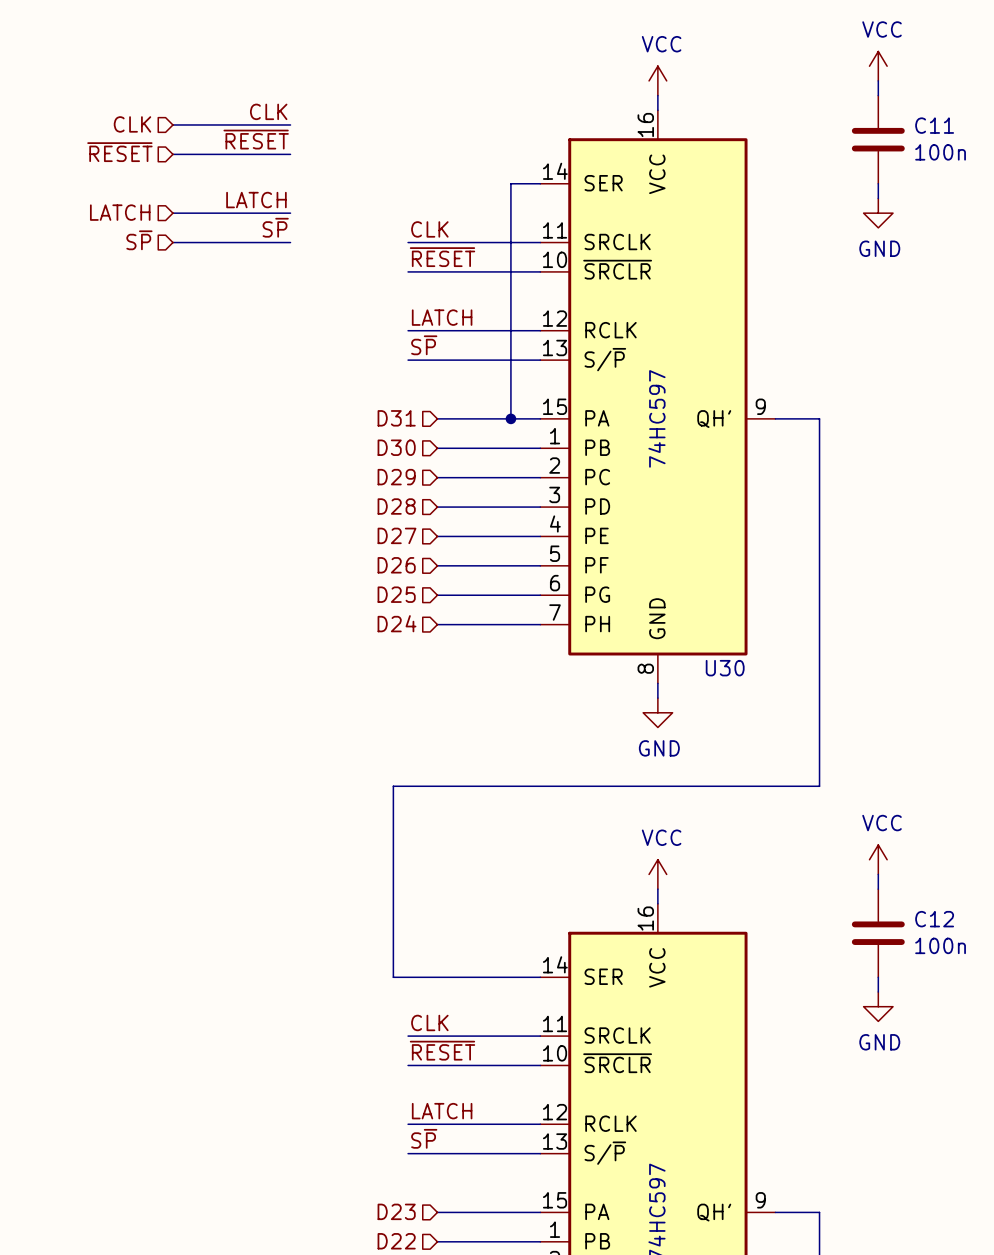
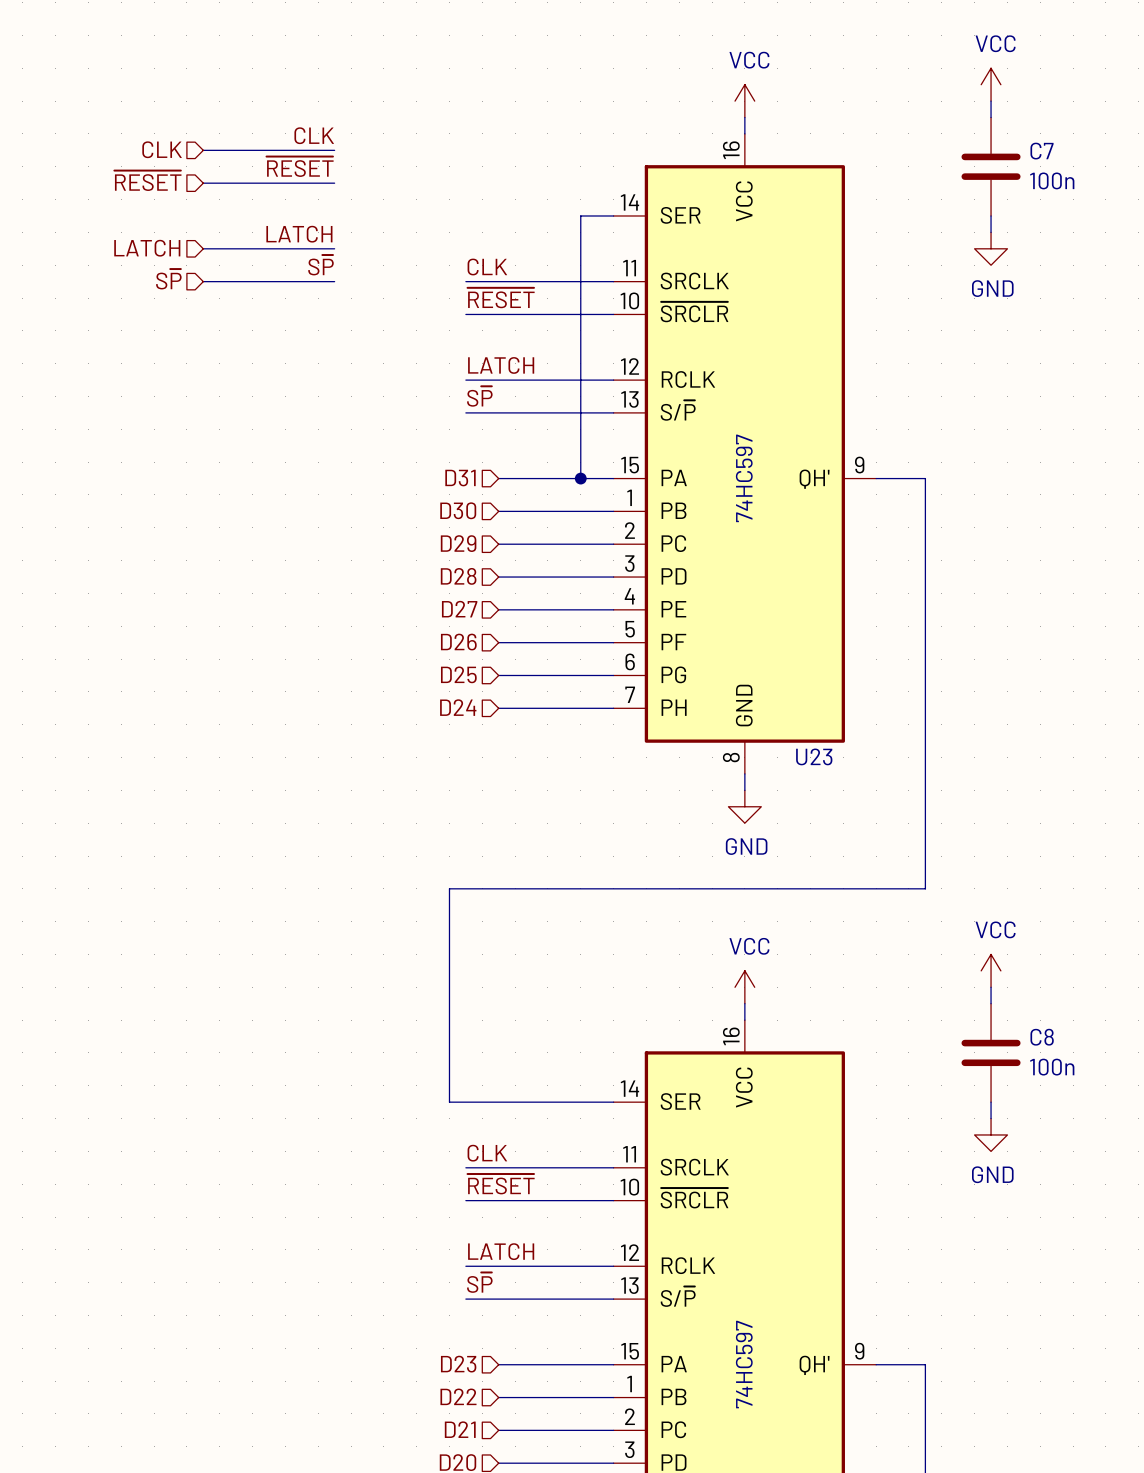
C11 name: C11 (934, 125) -> C7 (1042, 151)
U30 name: U30 (725, 668) -> U23 (814, 756)
C12 name: C12 (934, 919) -> C8 (1042, 1037)

